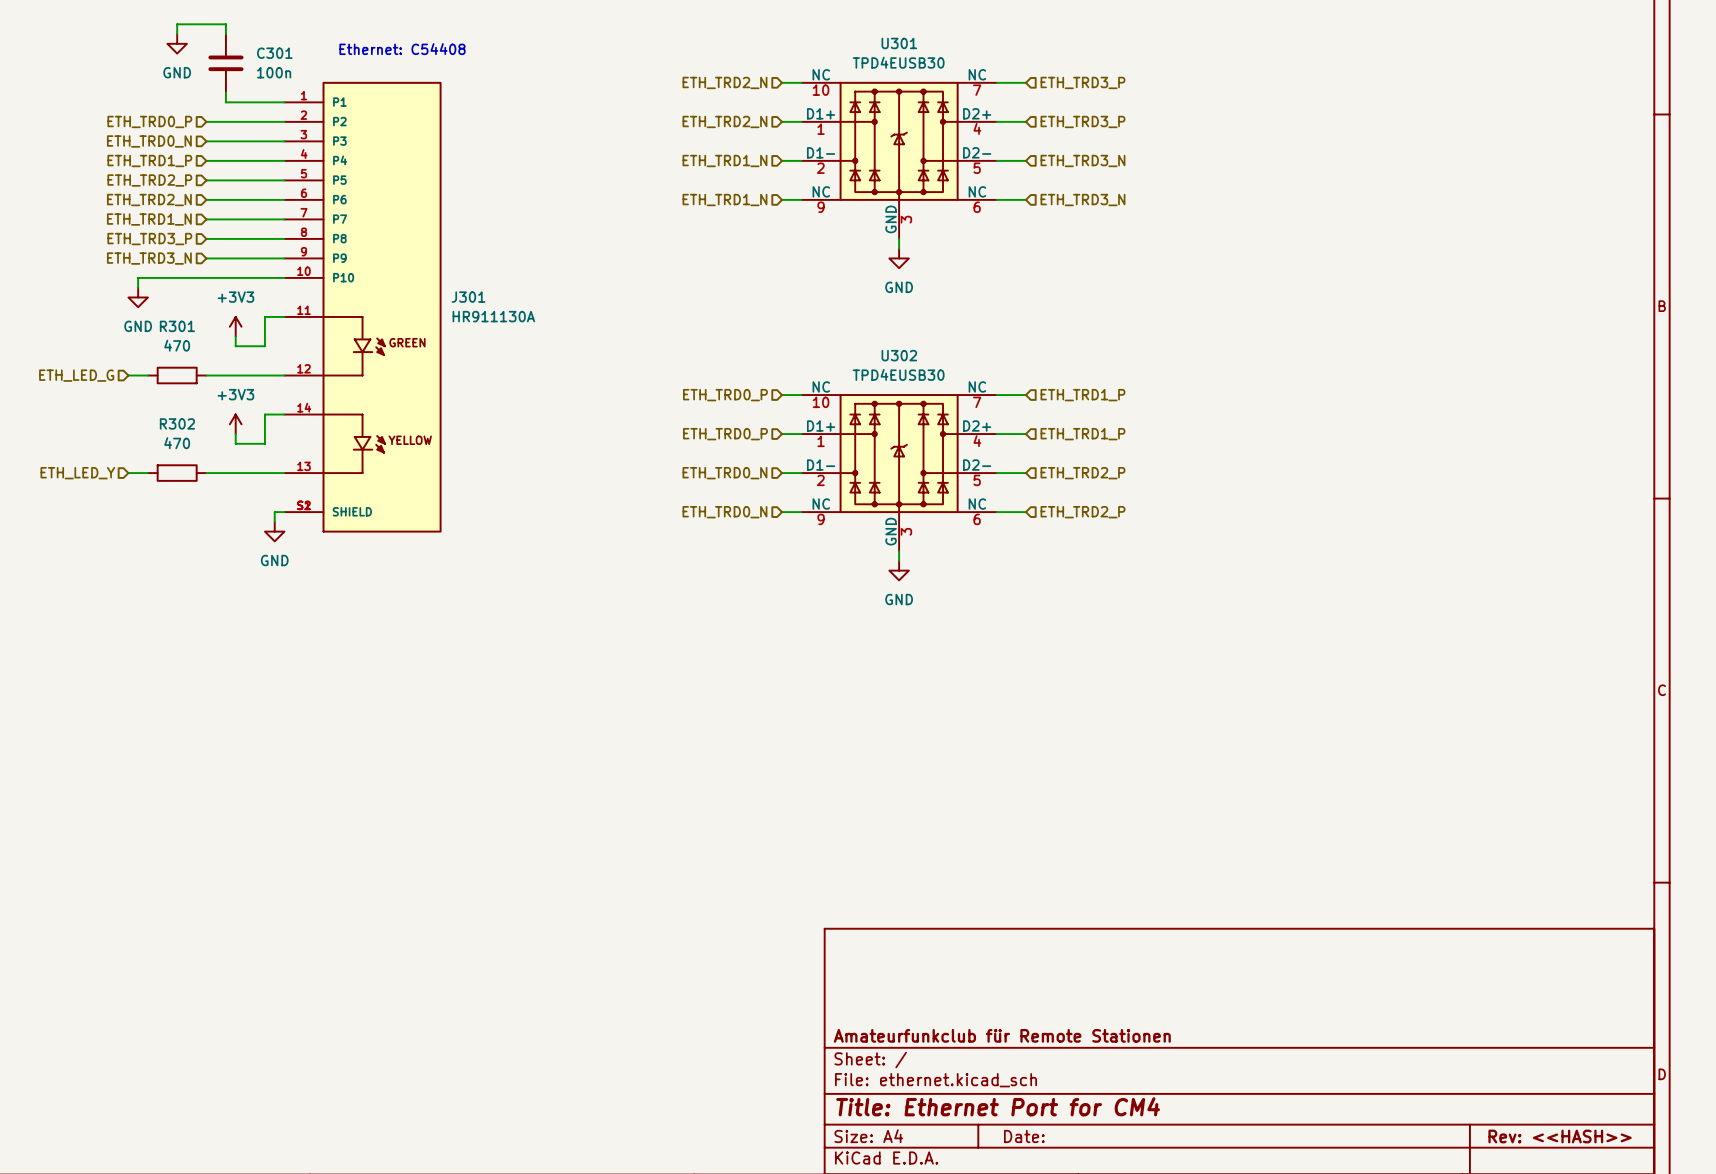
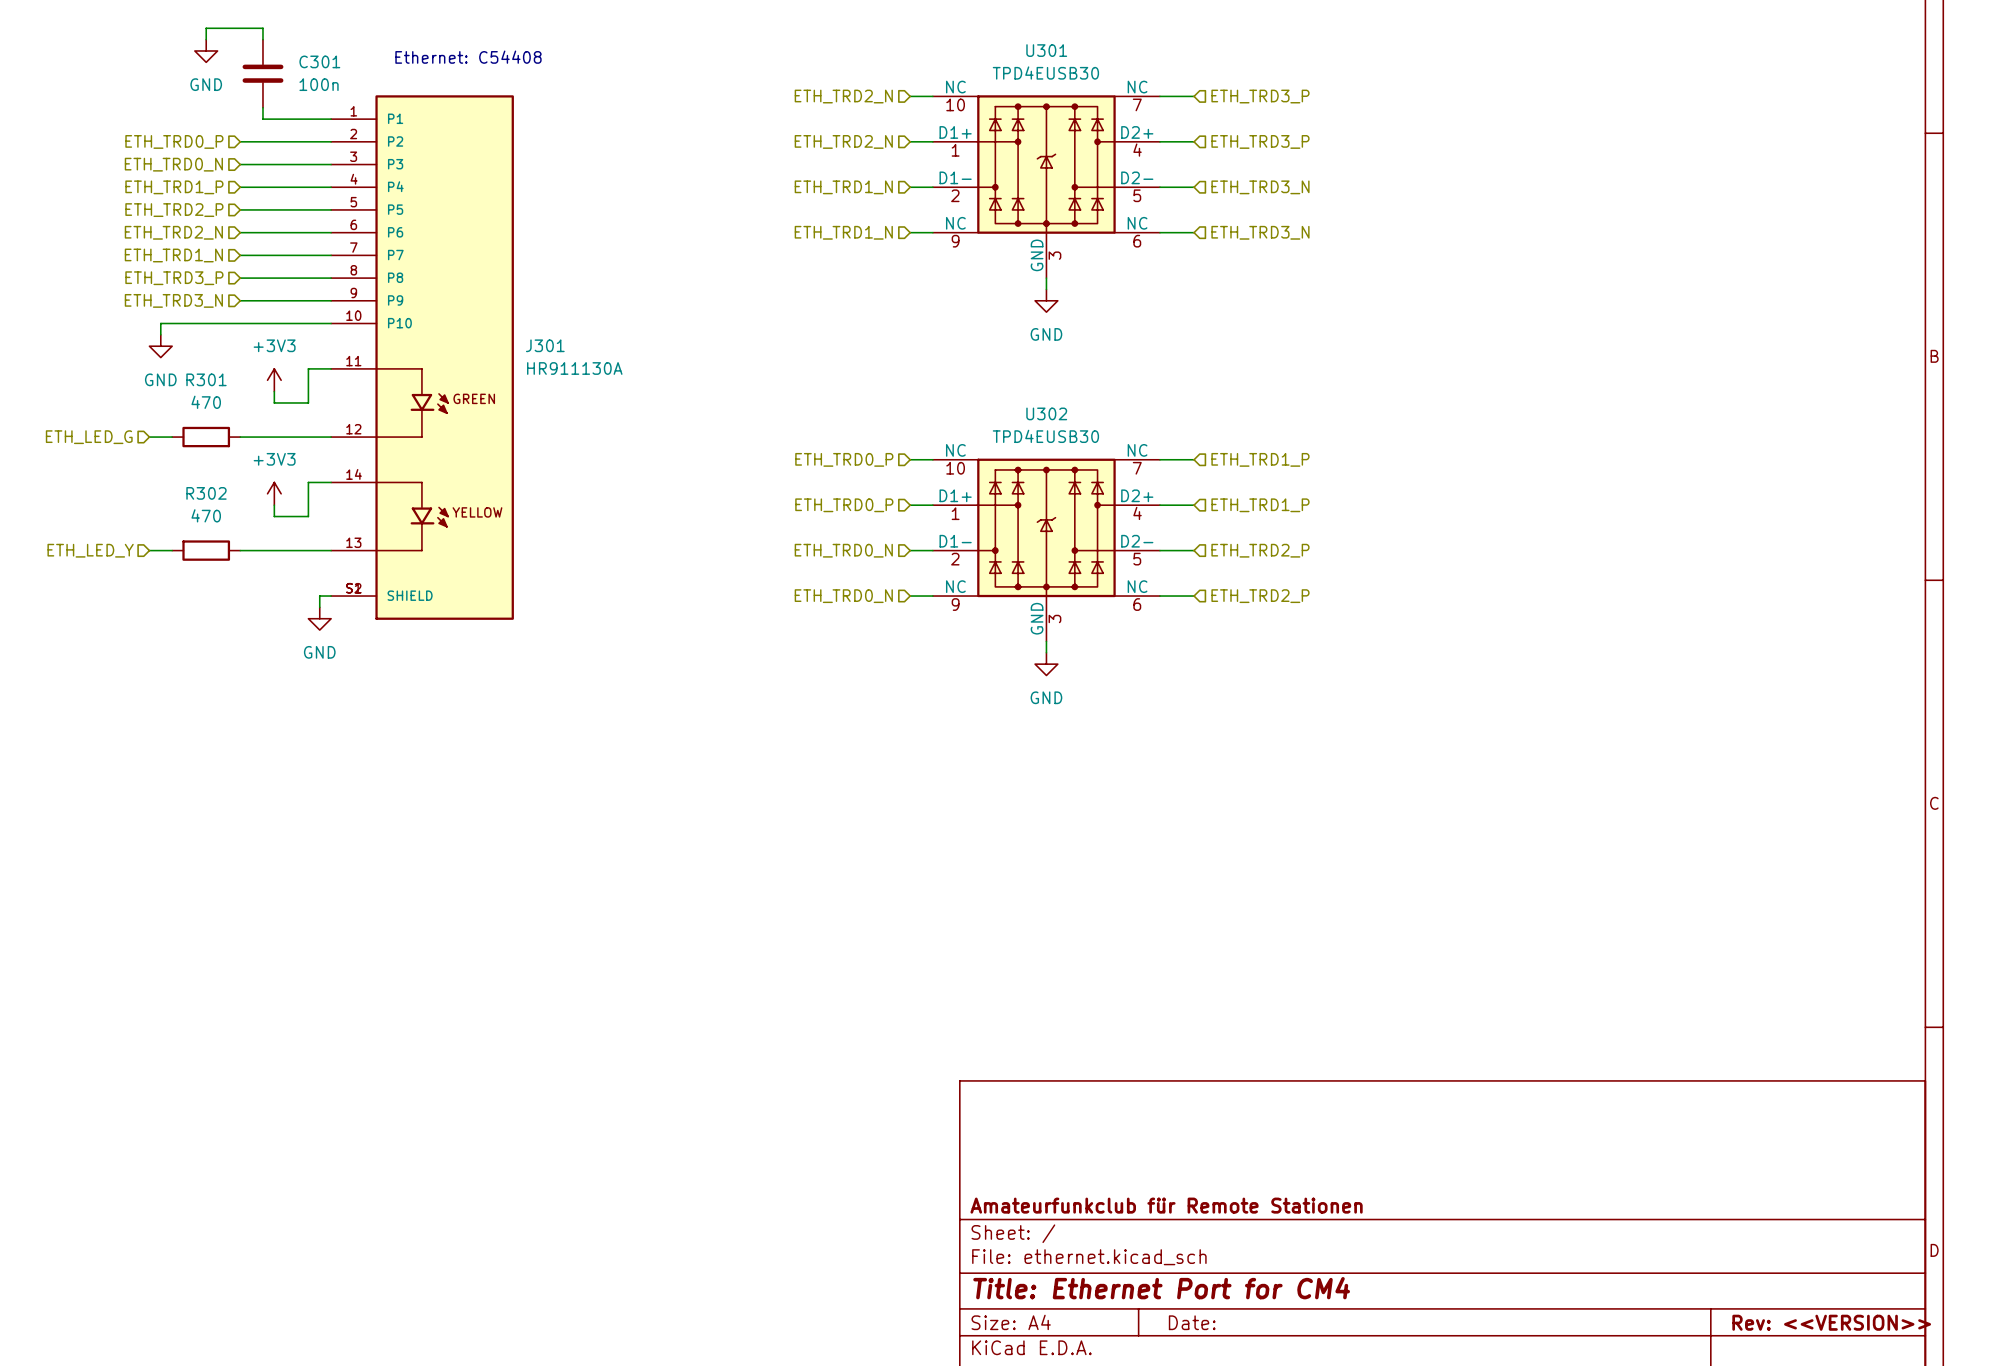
title block: Rev: <<HASH>> (1560, 1136) -> Rev: <<VERSION>> (1831, 1322)

